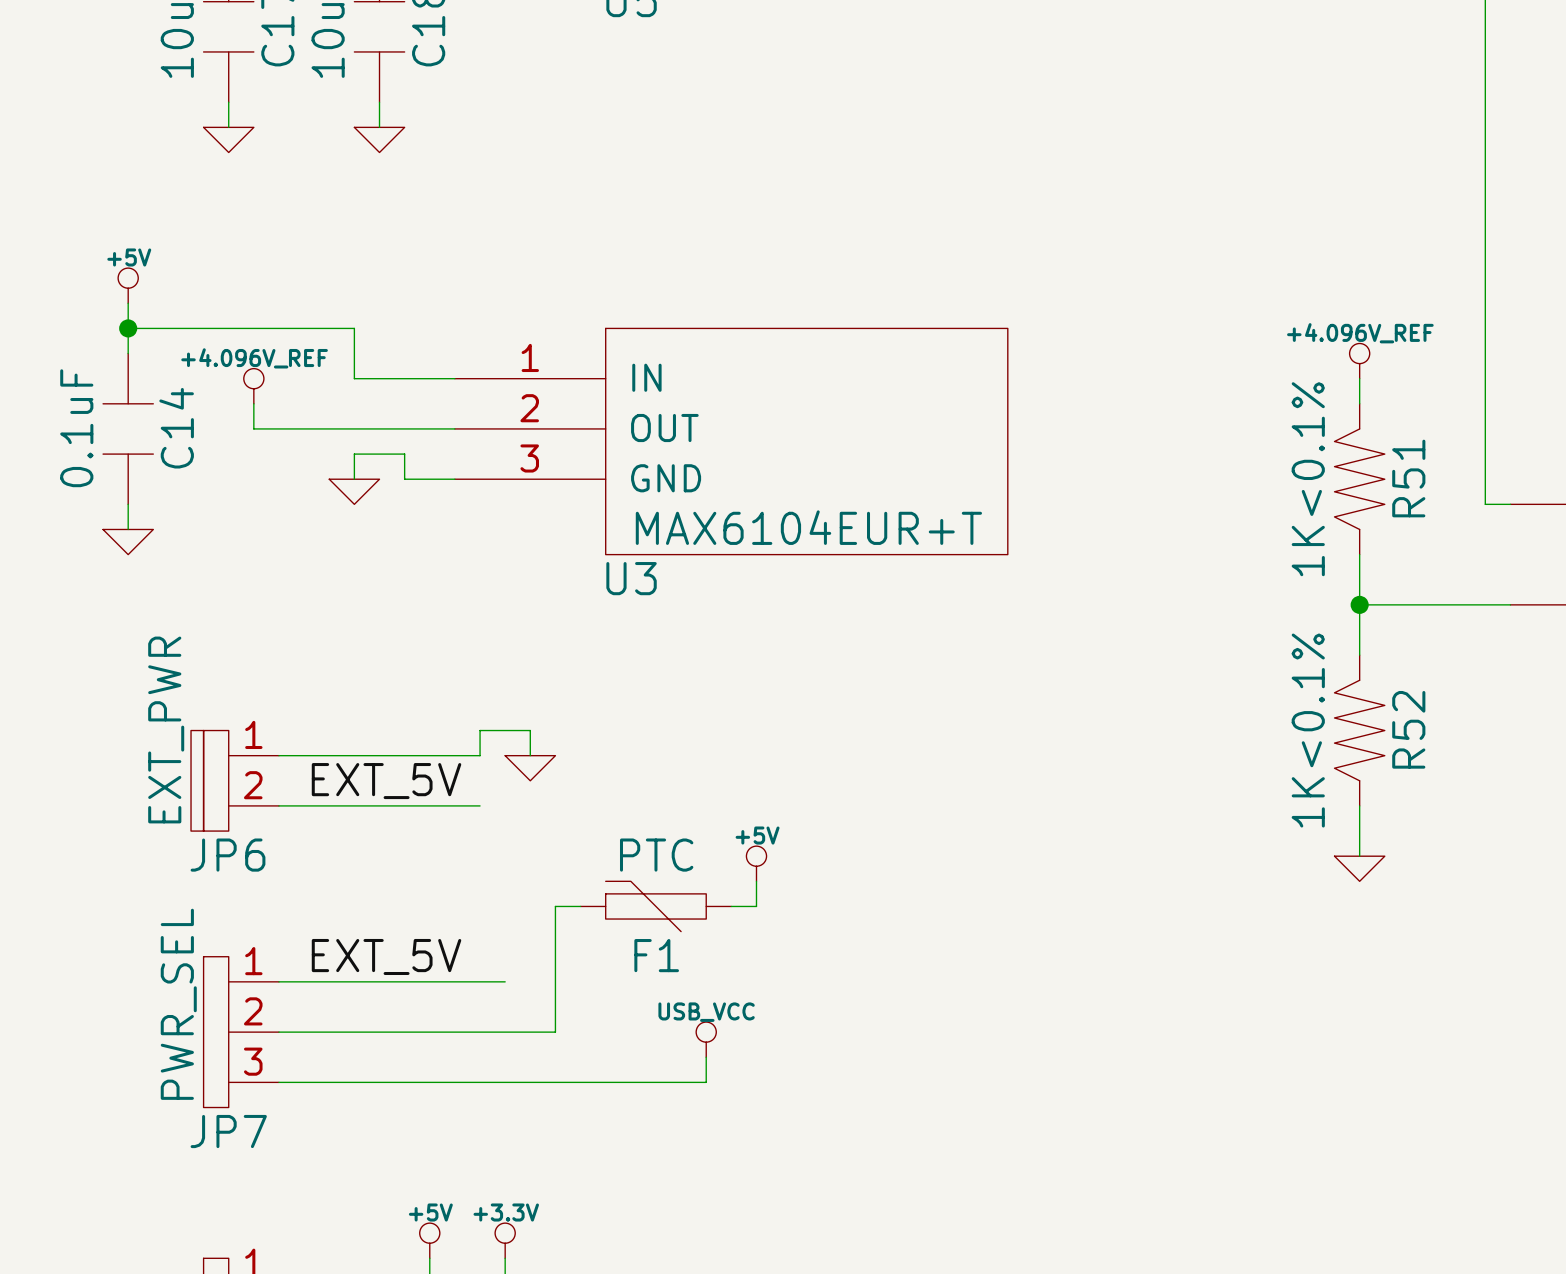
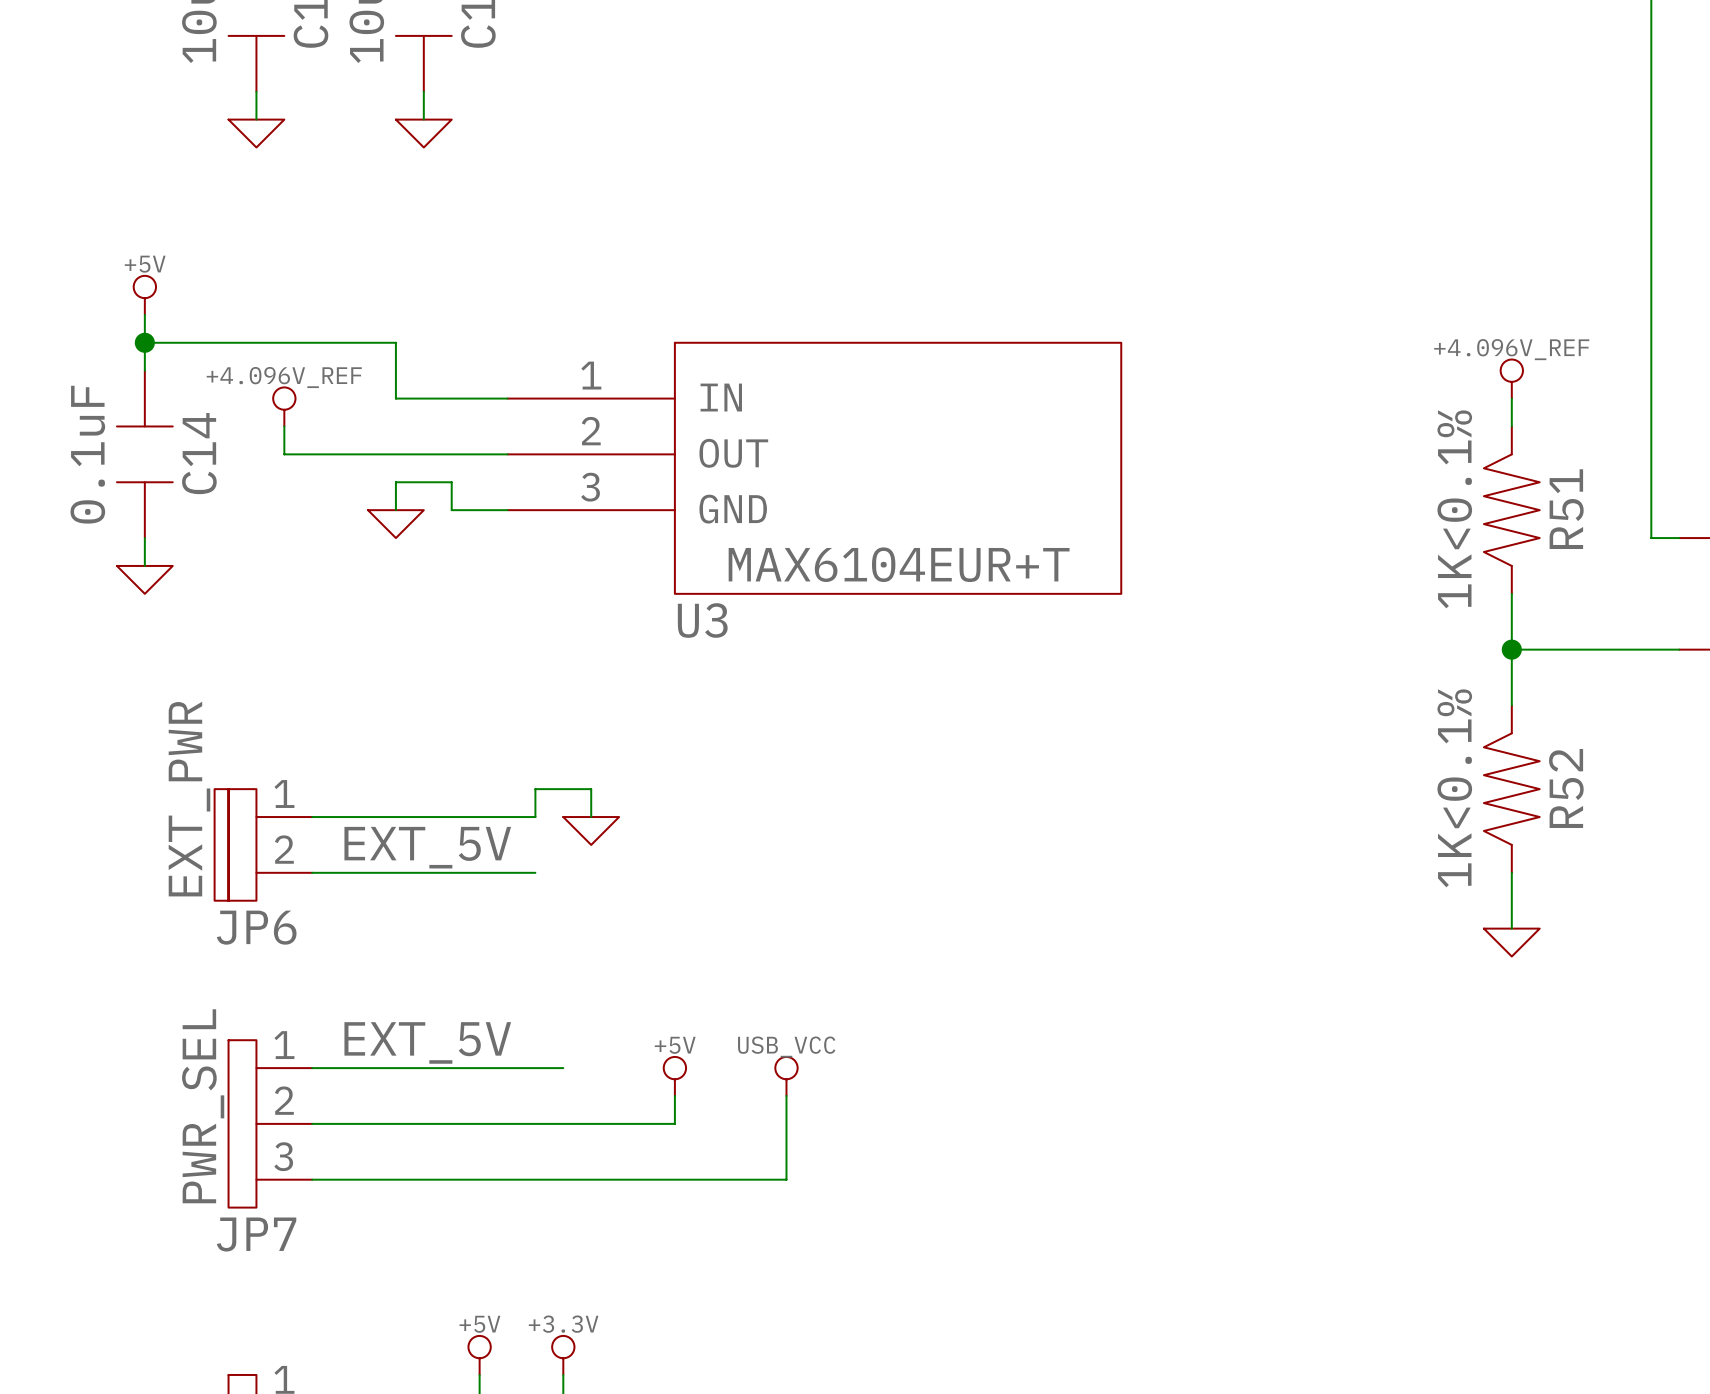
power symbol position: +5V (756, 863) -> +5V (674, 1076)
wire: (756, 881) (756, 906) (731, 906) -> none
wire: (580, 906) (555, 906) (555, 1032) -> (674, 1096) (674, 1123) (619, 1123)
F1: PTC (655, 906) -> none
wire: none -> (786, 1096) (786, 1151)
power symbol position: USB_VCC (706, 1039) -> USB_VCC (786, 1076)

